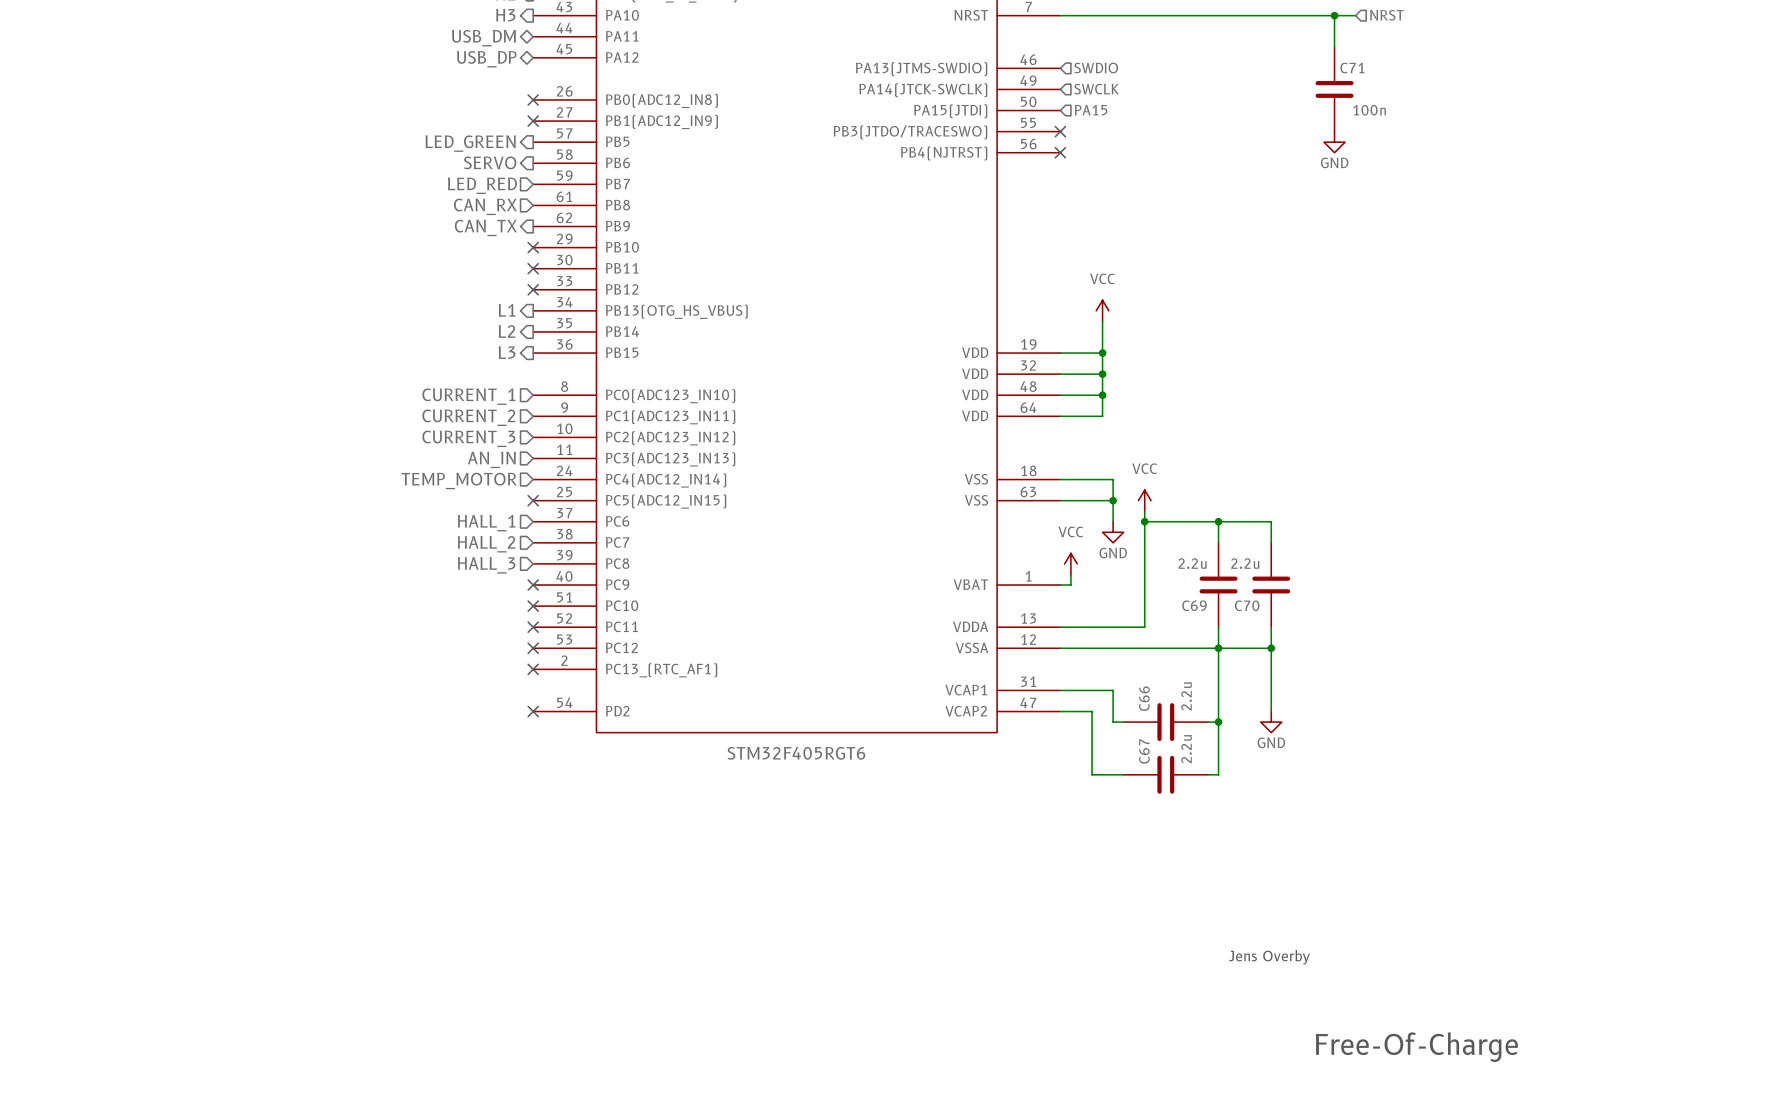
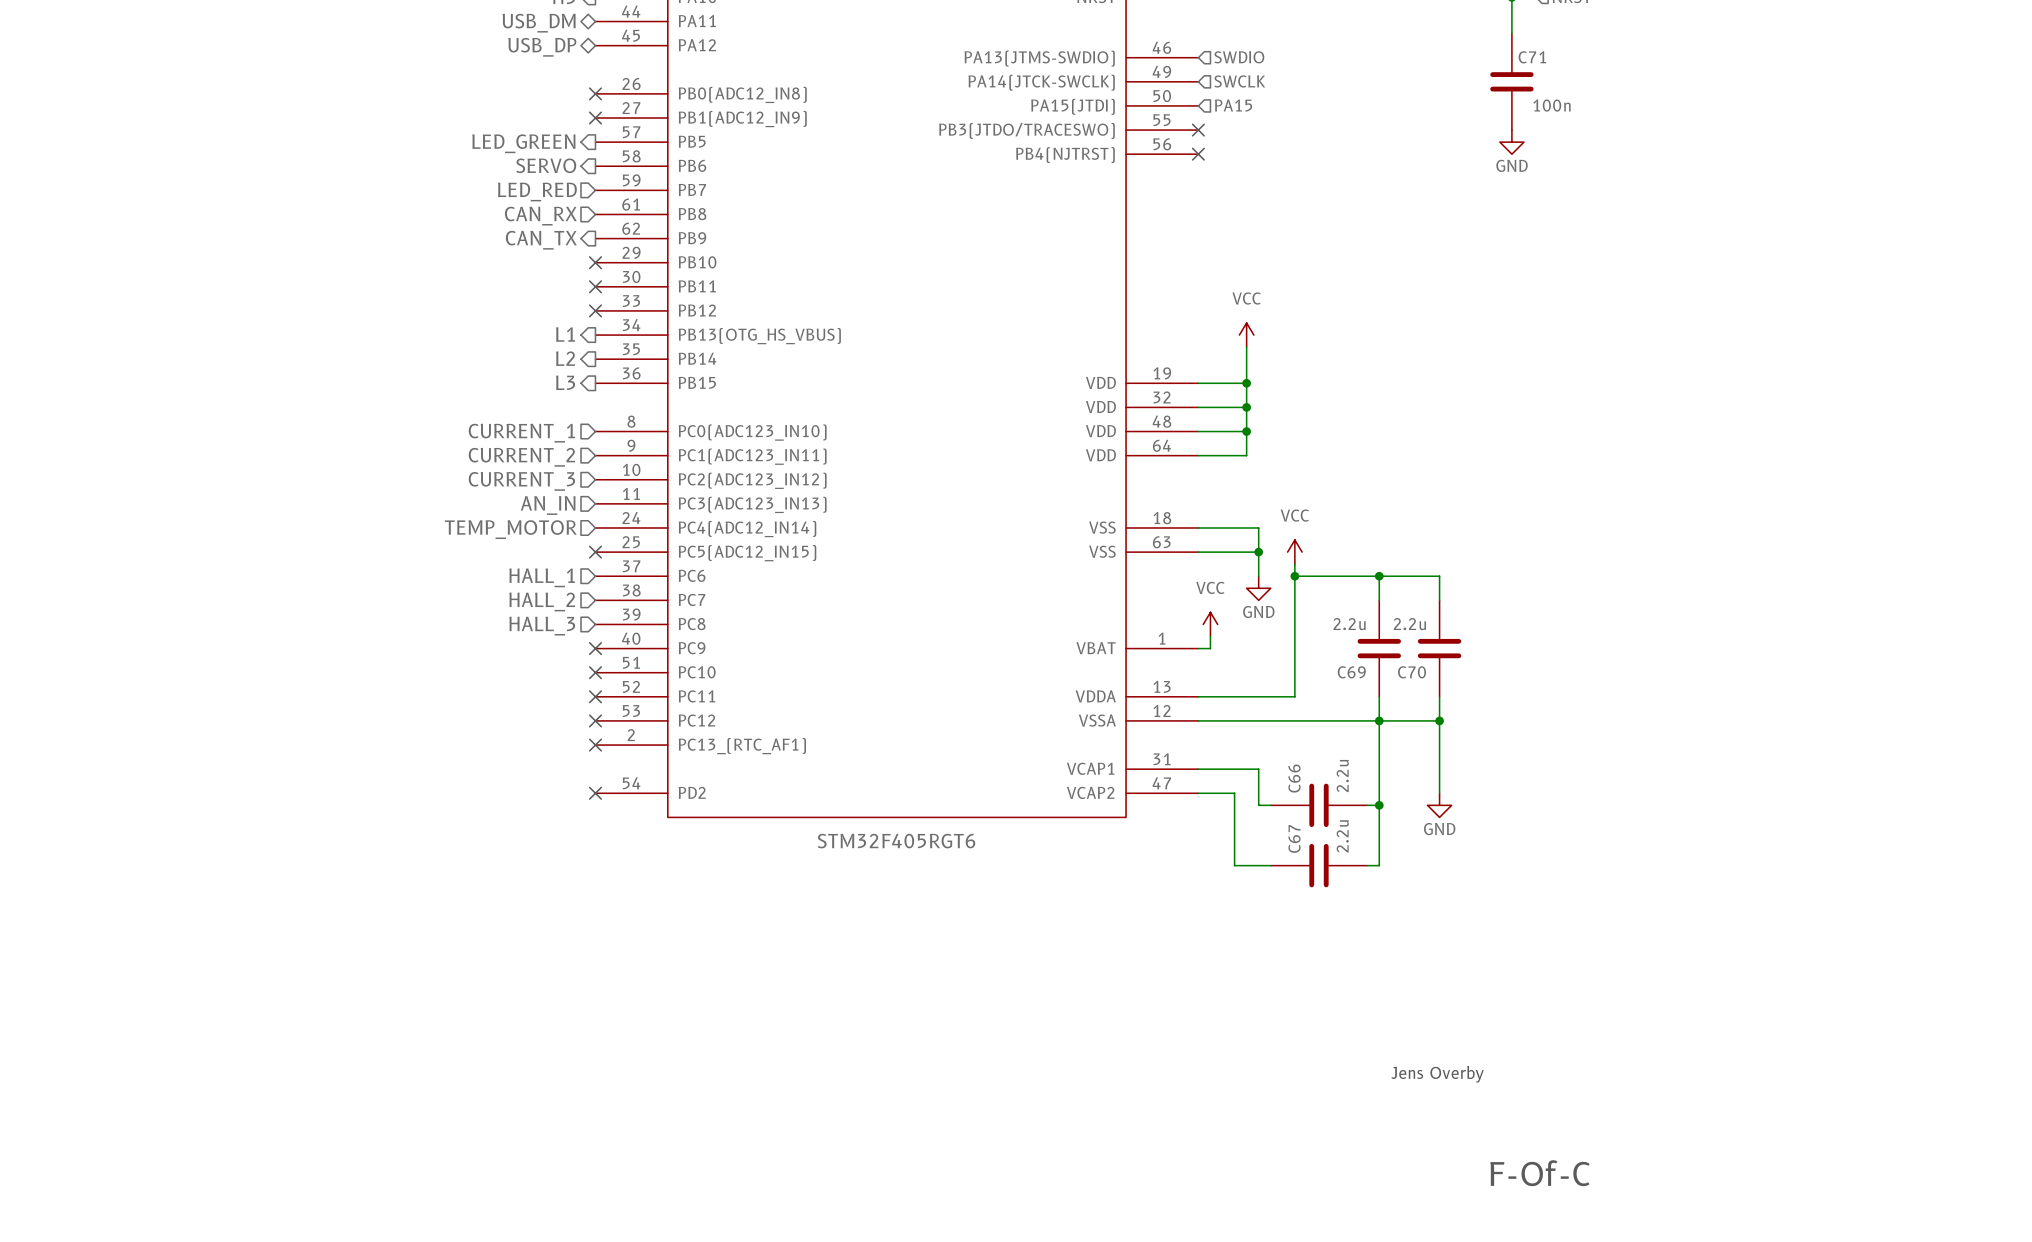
text: Free-Of-Charge (1416, 1047) -> F-Of-C (1540, 1173)

